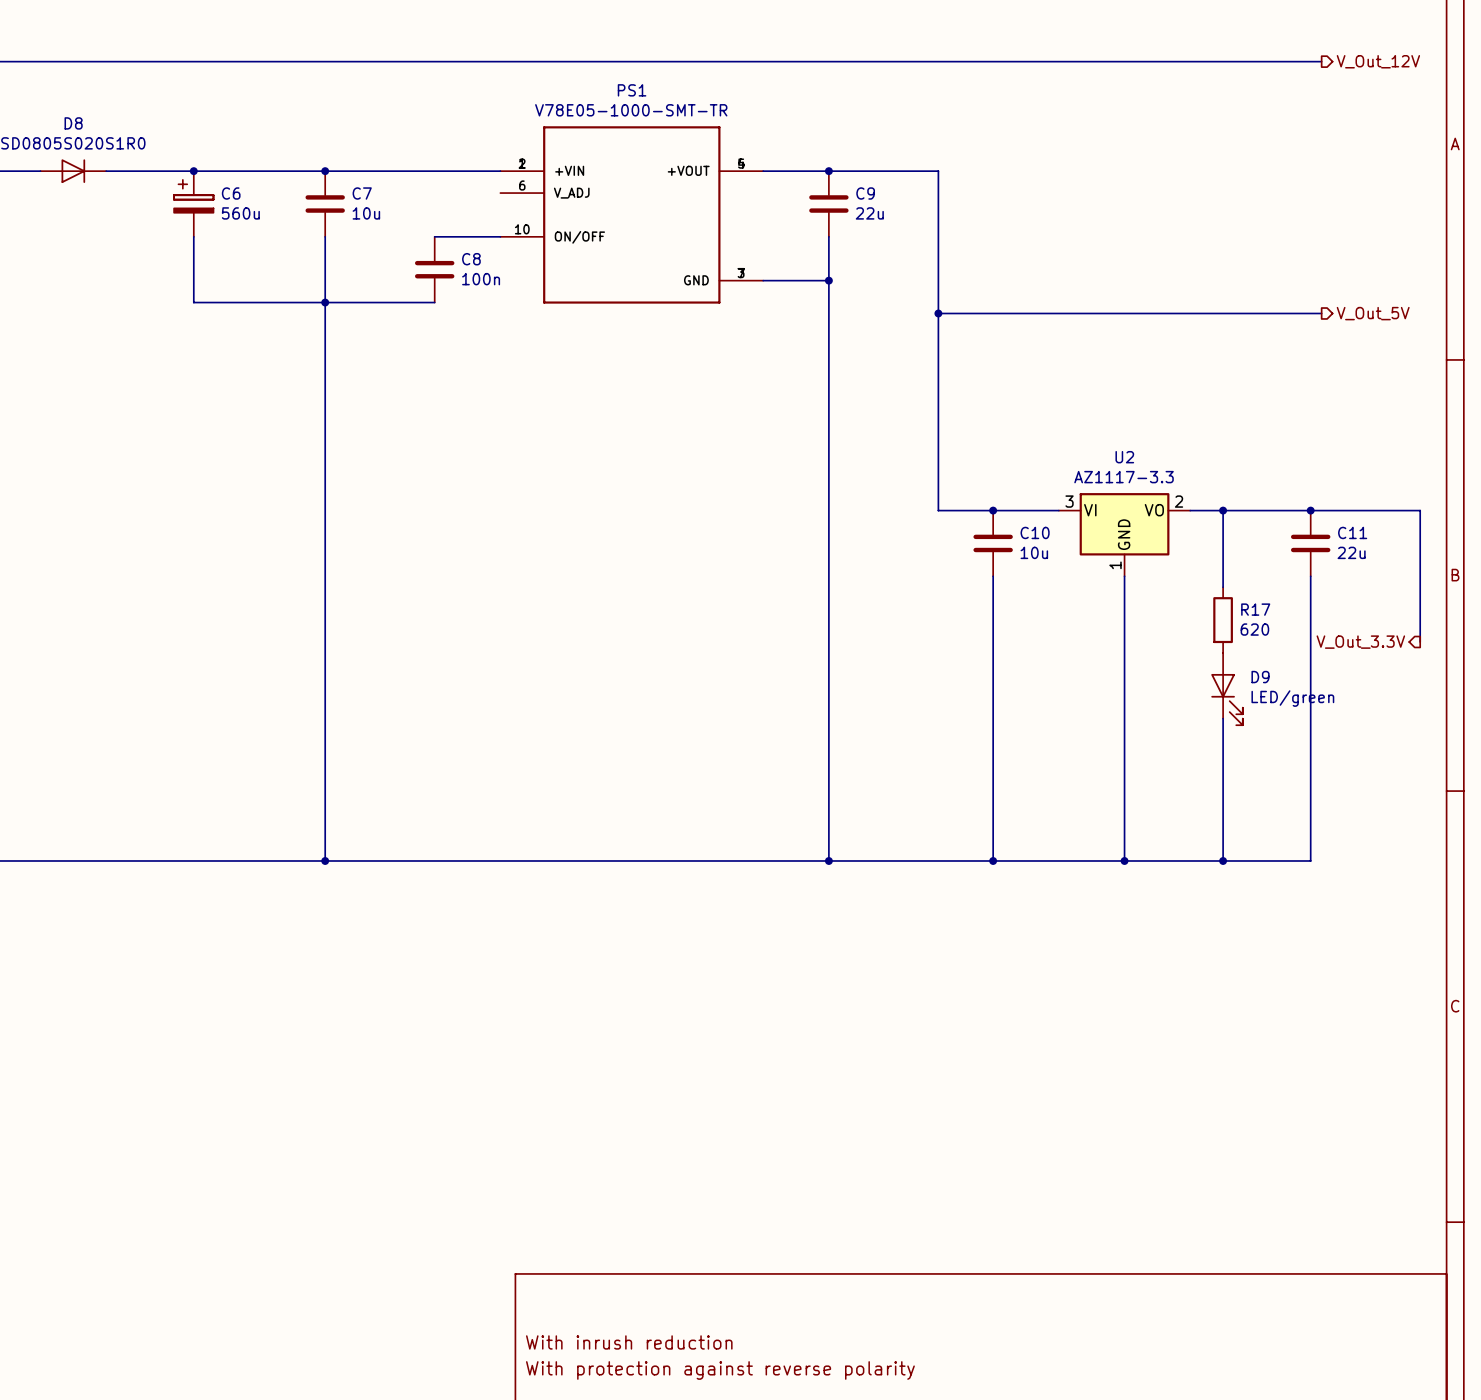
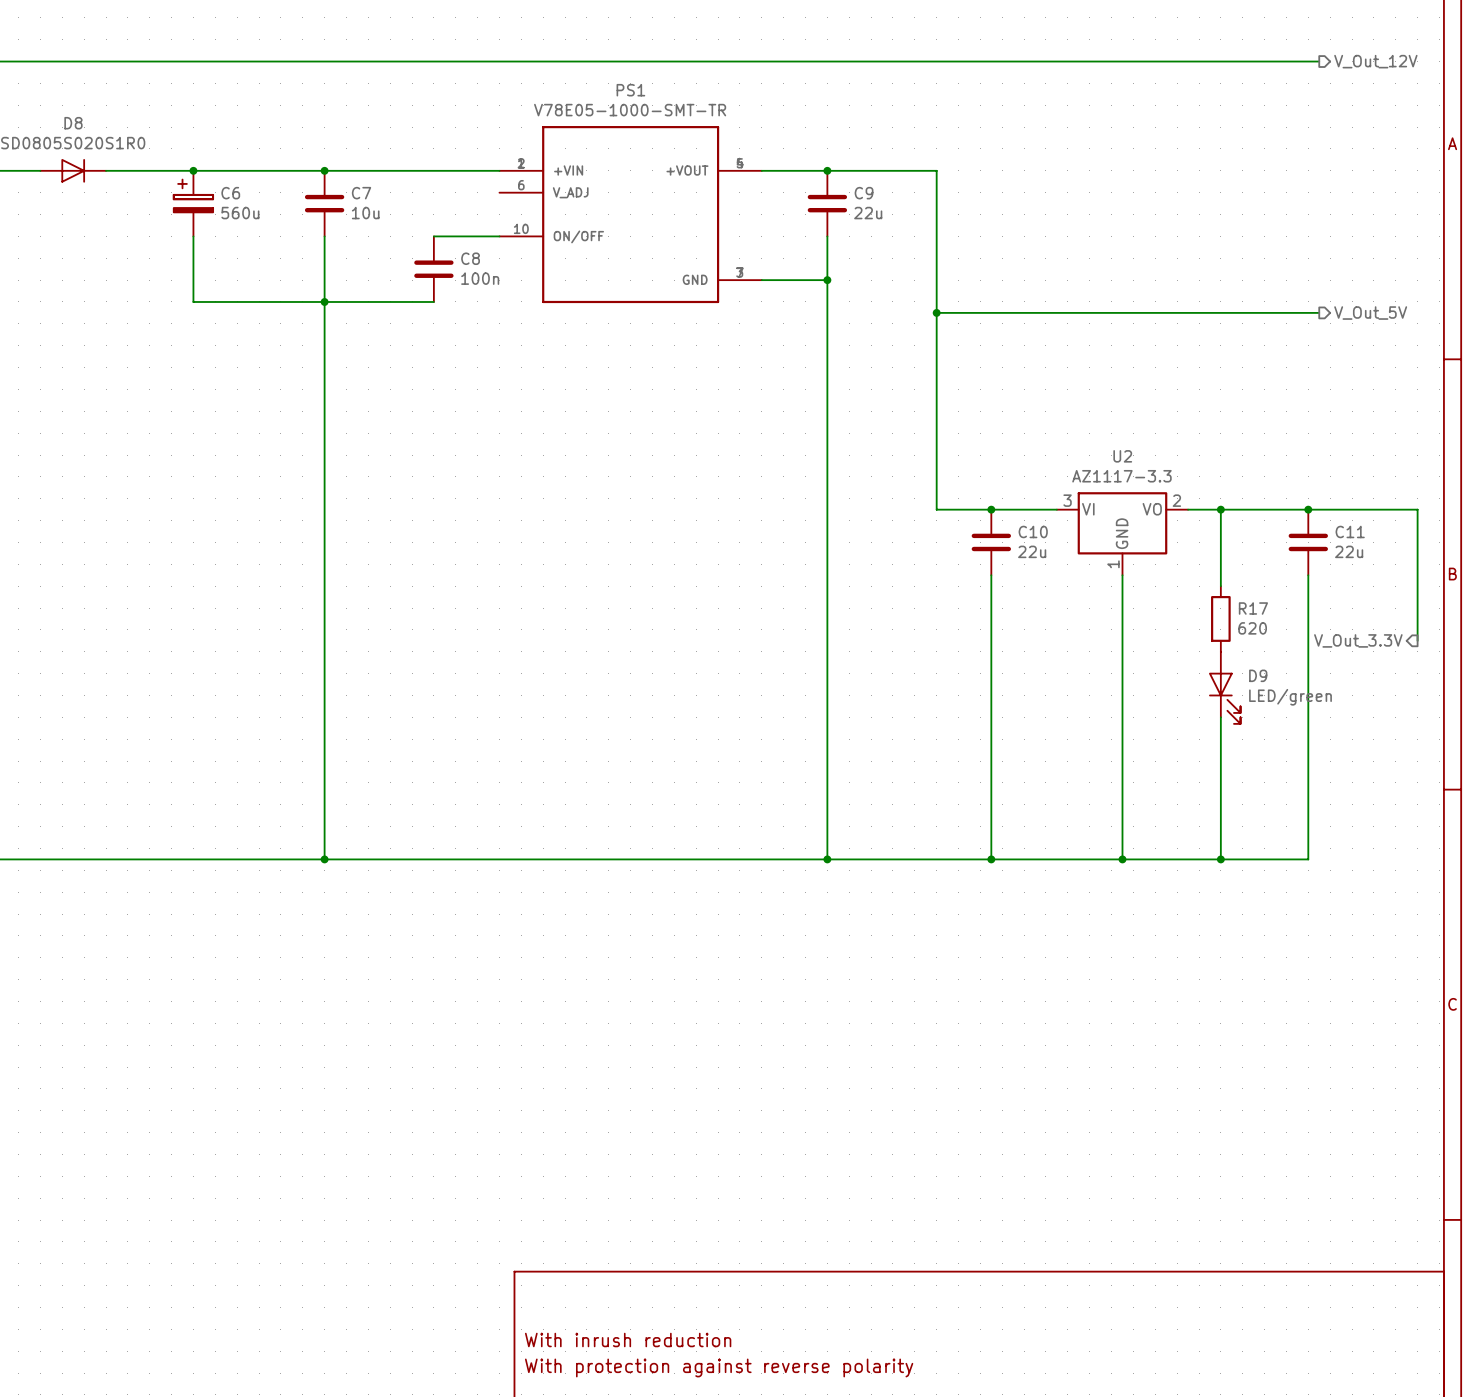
C10 value: 10u (1034, 552) -> 22u (1032, 551)

